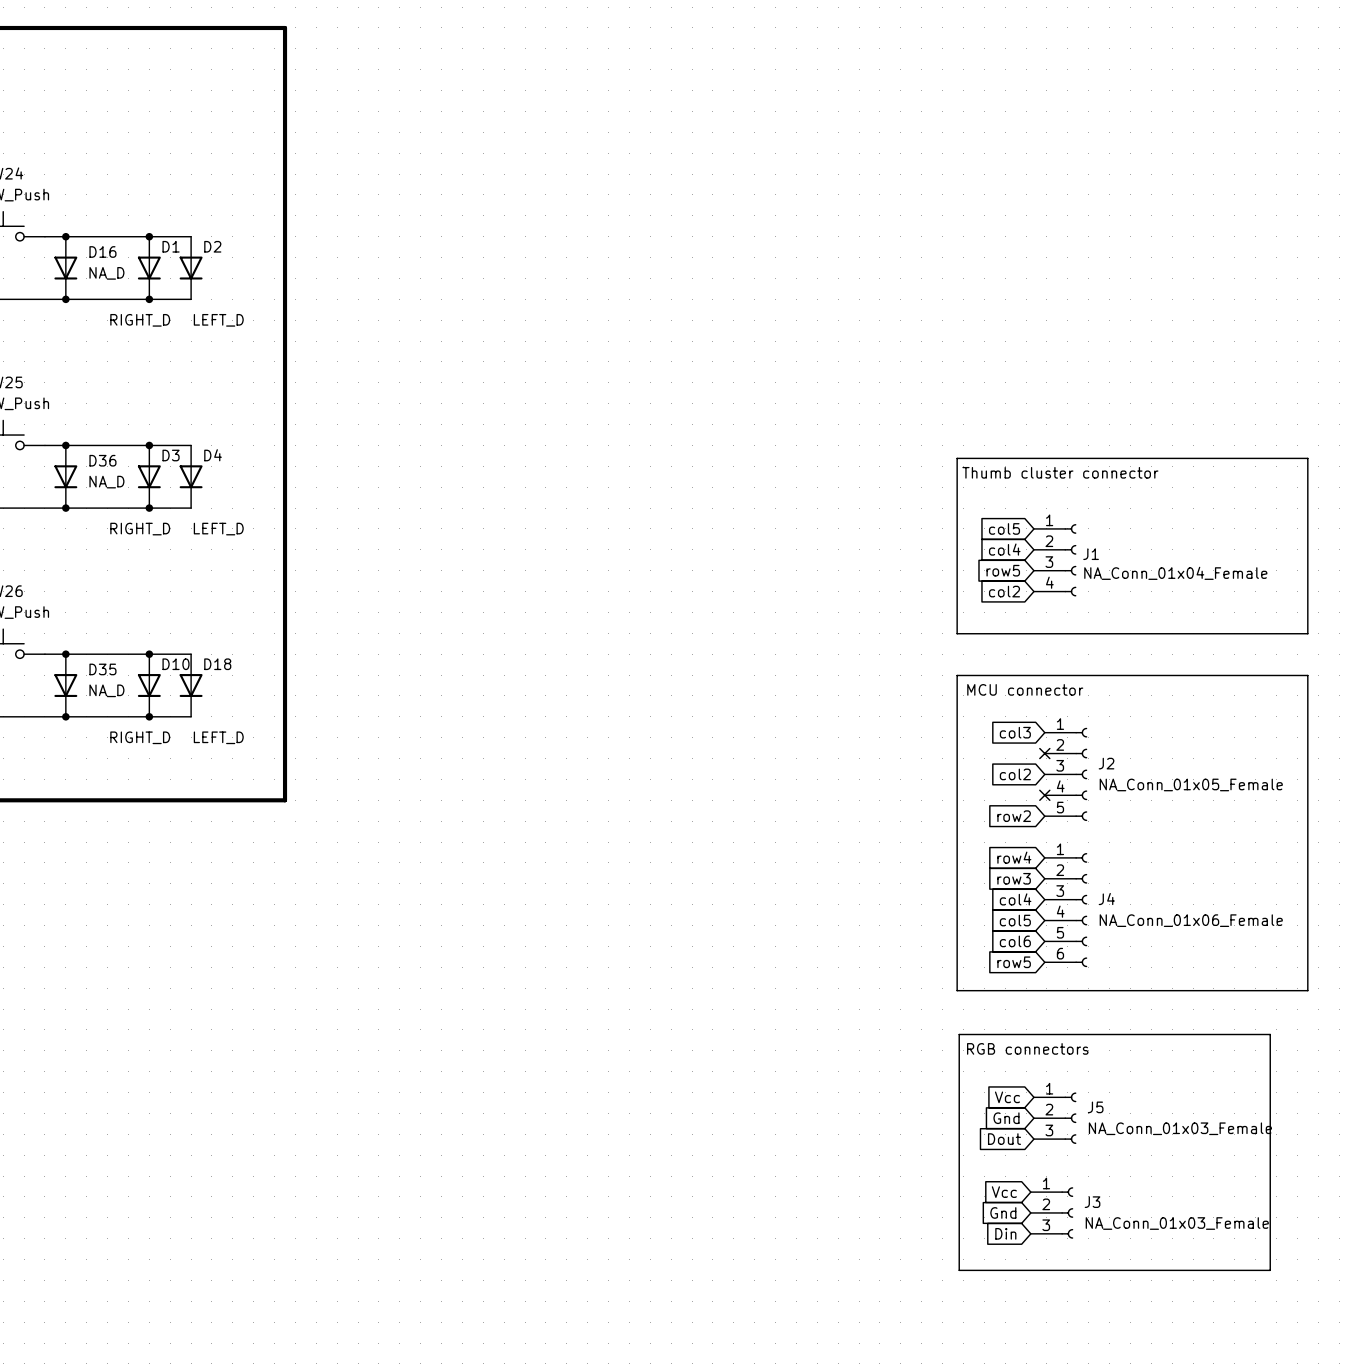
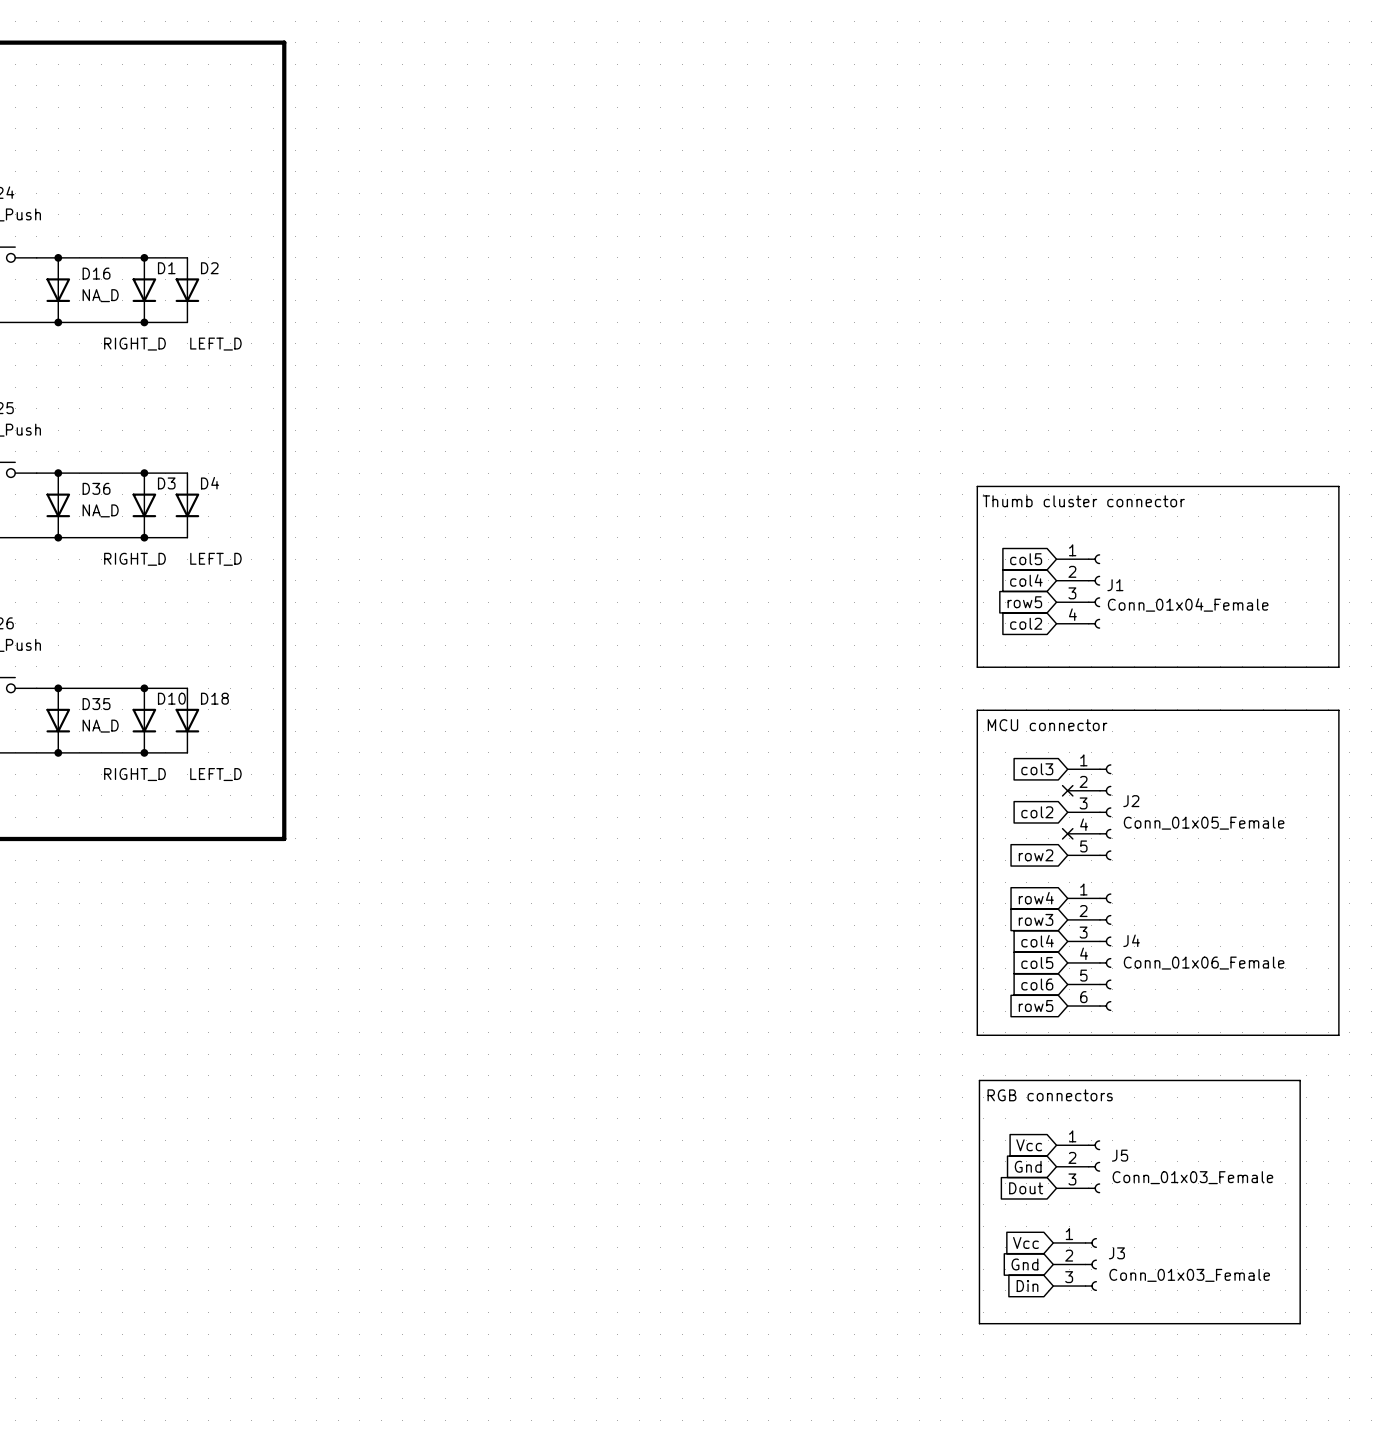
J1 value: NA_Conn_01x04_Female (1175, 573) -> Conn_01x04_Female (1188, 604)
J2 value: NA_Conn_01x05_Female (1191, 784) -> Conn_01x05_Female (1204, 823)
J4 value: NA_Conn_01x06_Female (1191, 920) -> Conn_01x06_Female (1204, 963)
J5 value: NA_Conn_01x03_Female (1180, 1128) -> Conn_01x03_Female (1192, 1177)
J3 value: NA_Conn_01x03_Female (1177, 1223) -> Conn_01x03_Female (1189, 1275)

